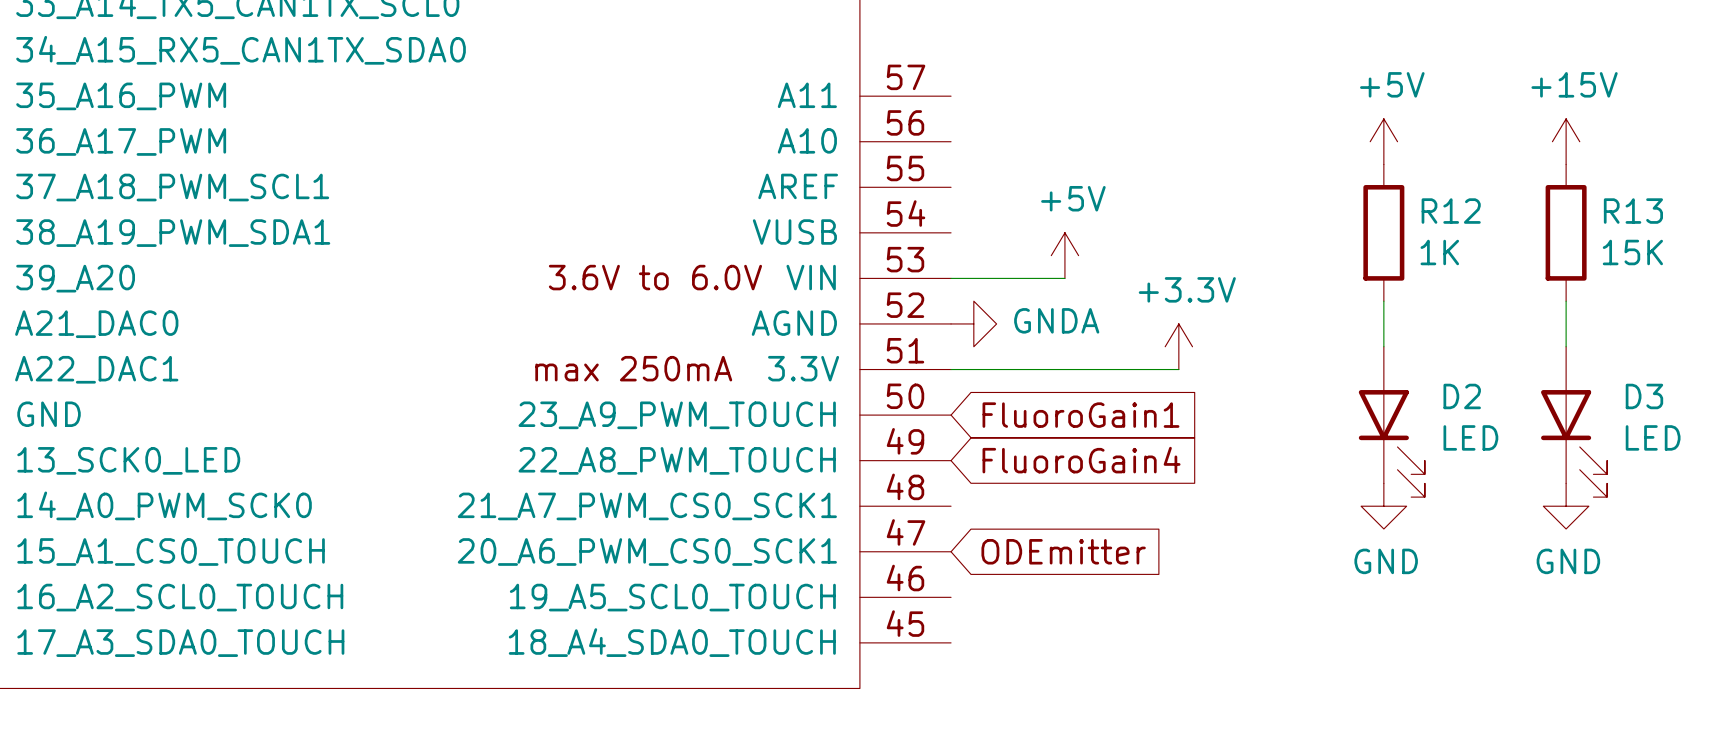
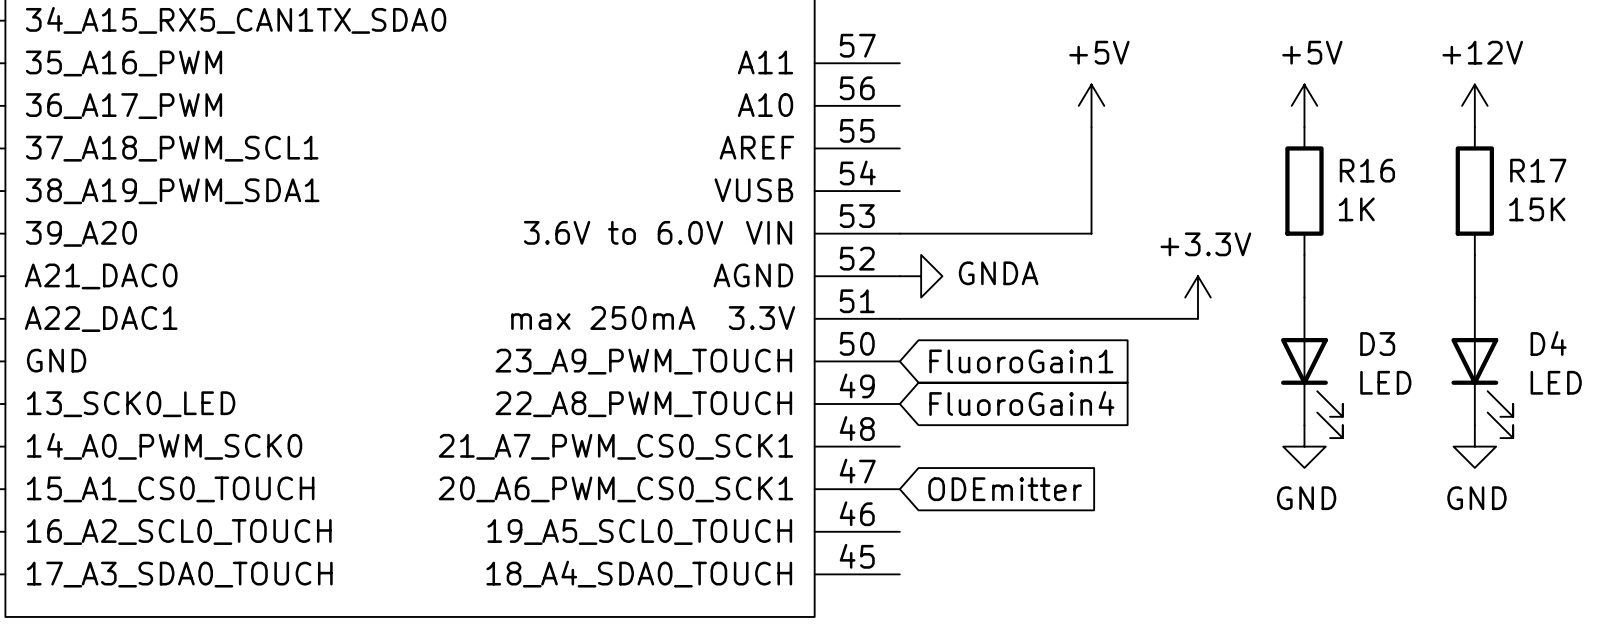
power symbol: +15V (1566, 141) -> +12V (1474, 105)
wire: none -> (1091, 127) (1091, 233) (1006, 233)
R12 name: R12 (1451, 211) -> R16 (1367, 170)
R13 name: R13 (1633, 211) -> R17 (1538, 170)
power symbol position: +5V (1064, 255) -> +5V (1091, 105)
power symbol position: +3.3V (1178, 346) -> +3.3V (1197, 297)
wire: none -> (1112, 318) (1197, 318)
D2 name: D2 (1462, 396) -> D3 (1377, 344)
D3 name: D3 (1644, 396) -> D4 (1548, 343)

